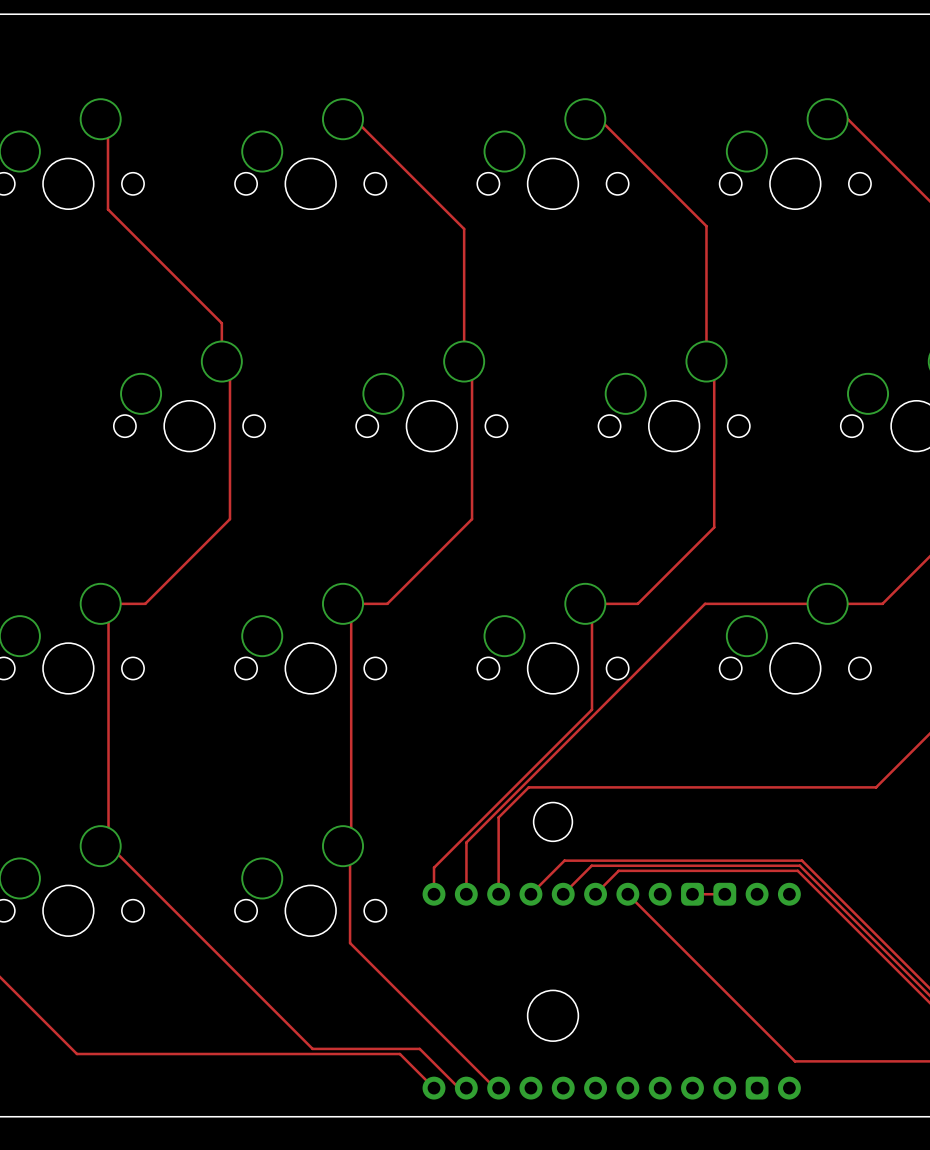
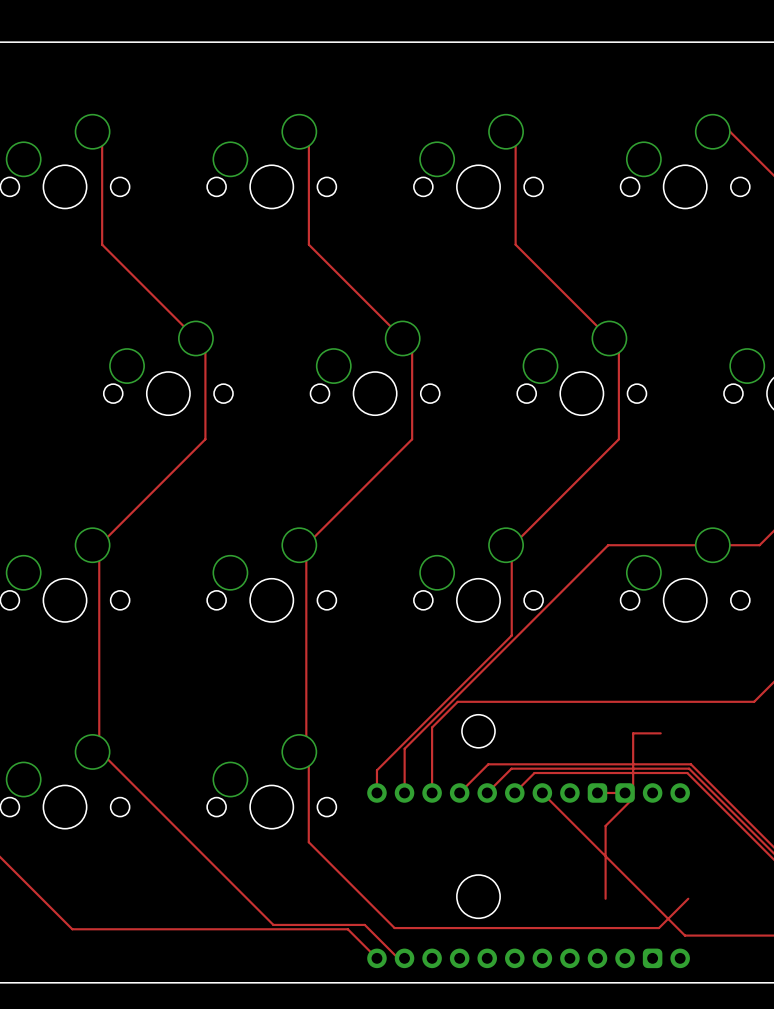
track: (343, 119) (354, 119) (464, 228) (464, 361) -> (302, 135) (308, 141) (308, 244) (402, 338)
track: (585, 119) (599, 119) (706, 226) (706, 361) -> (509, 135) (515, 141) (515, 244) (609, 338)
track: (108, 126) (108, 209) (221, 323) (221, 361) -> (98, 137) (102, 141) (102, 244) (195, 338)
track: (229, 369) (229, 519) (145, 603) (100, 603) (104, 607) -> (202, 345) (205, 347) (205, 439) (96, 548)
track: (472, 369) (472, 519) (387, 603) (343, 603) (347, 607) -> (409, 345) (412, 347) (412, 439) (302, 548)
track: (714, 369) (714, 527) (637, 603) (585, 603) (589, 607) -> (616, 345) (618, 347) (618, 439) (509, 548)
track: none -> (660, 733) (633, 733) (633, 798) (605, 825) (605, 898)
track: (350, 853) (350, 943) (495, 1088) (498, 1088) -> (305, 757) (308, 761) (308, 842) (394, 928) (658, 928) (688, 898)

